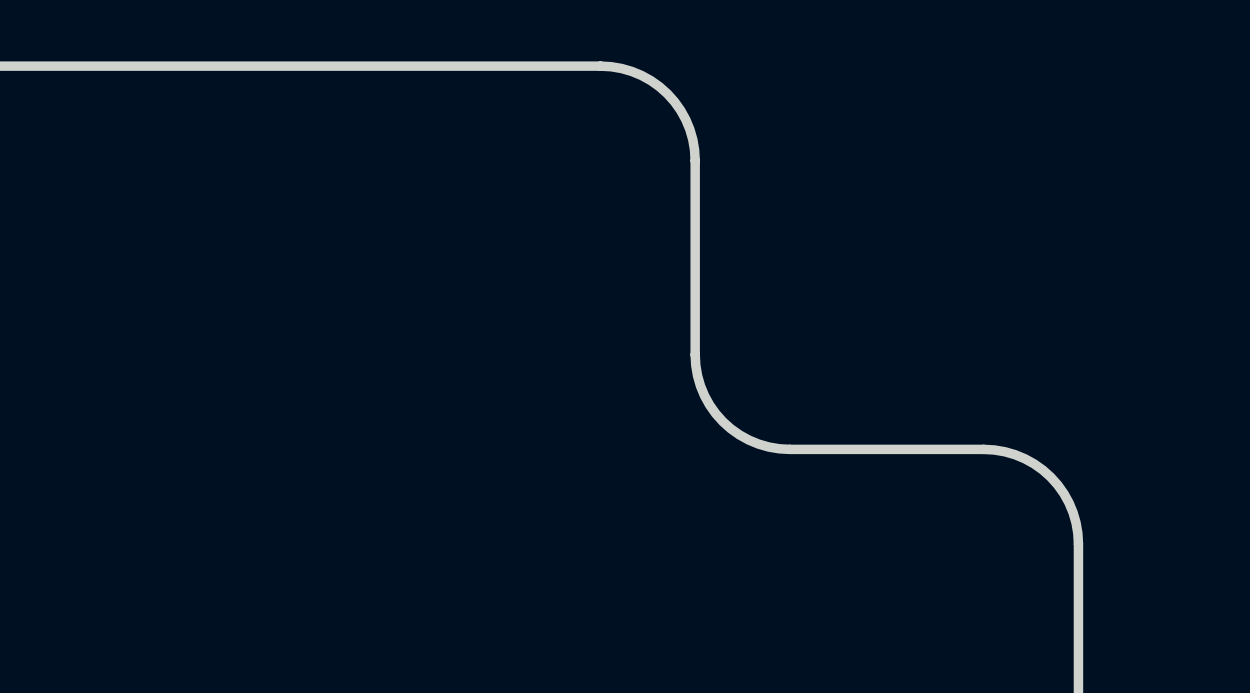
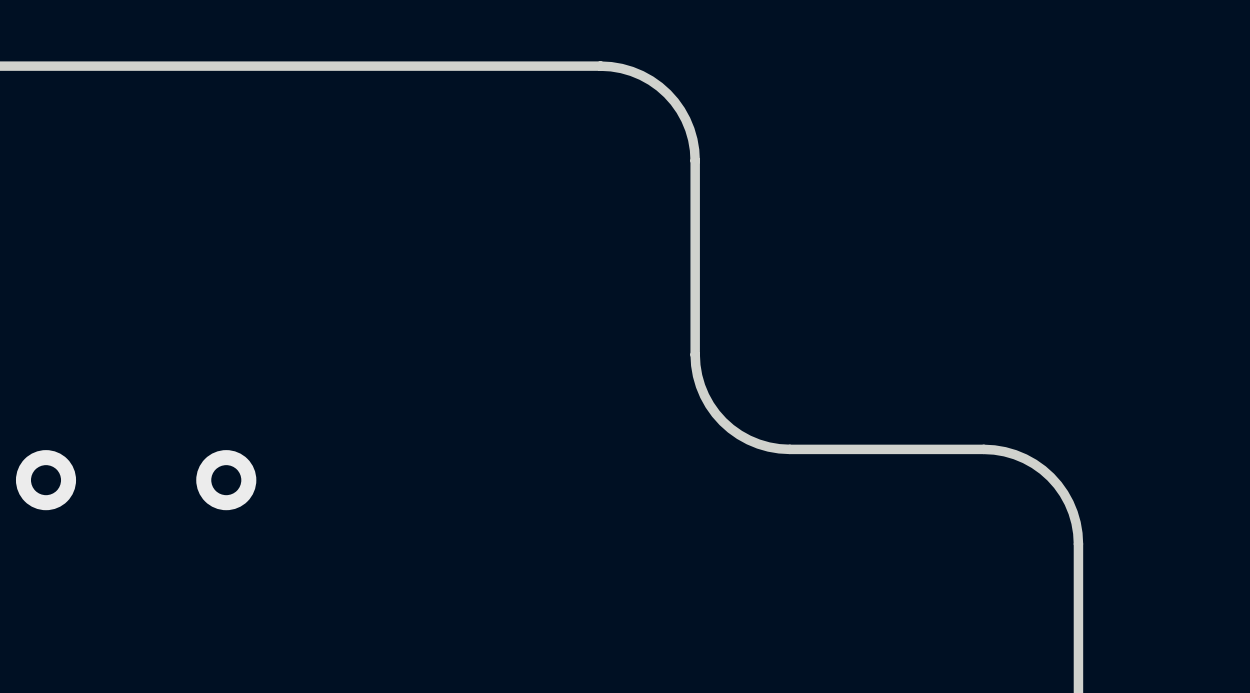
via: none -> (46, 480)
via: none -> (226, 480)

